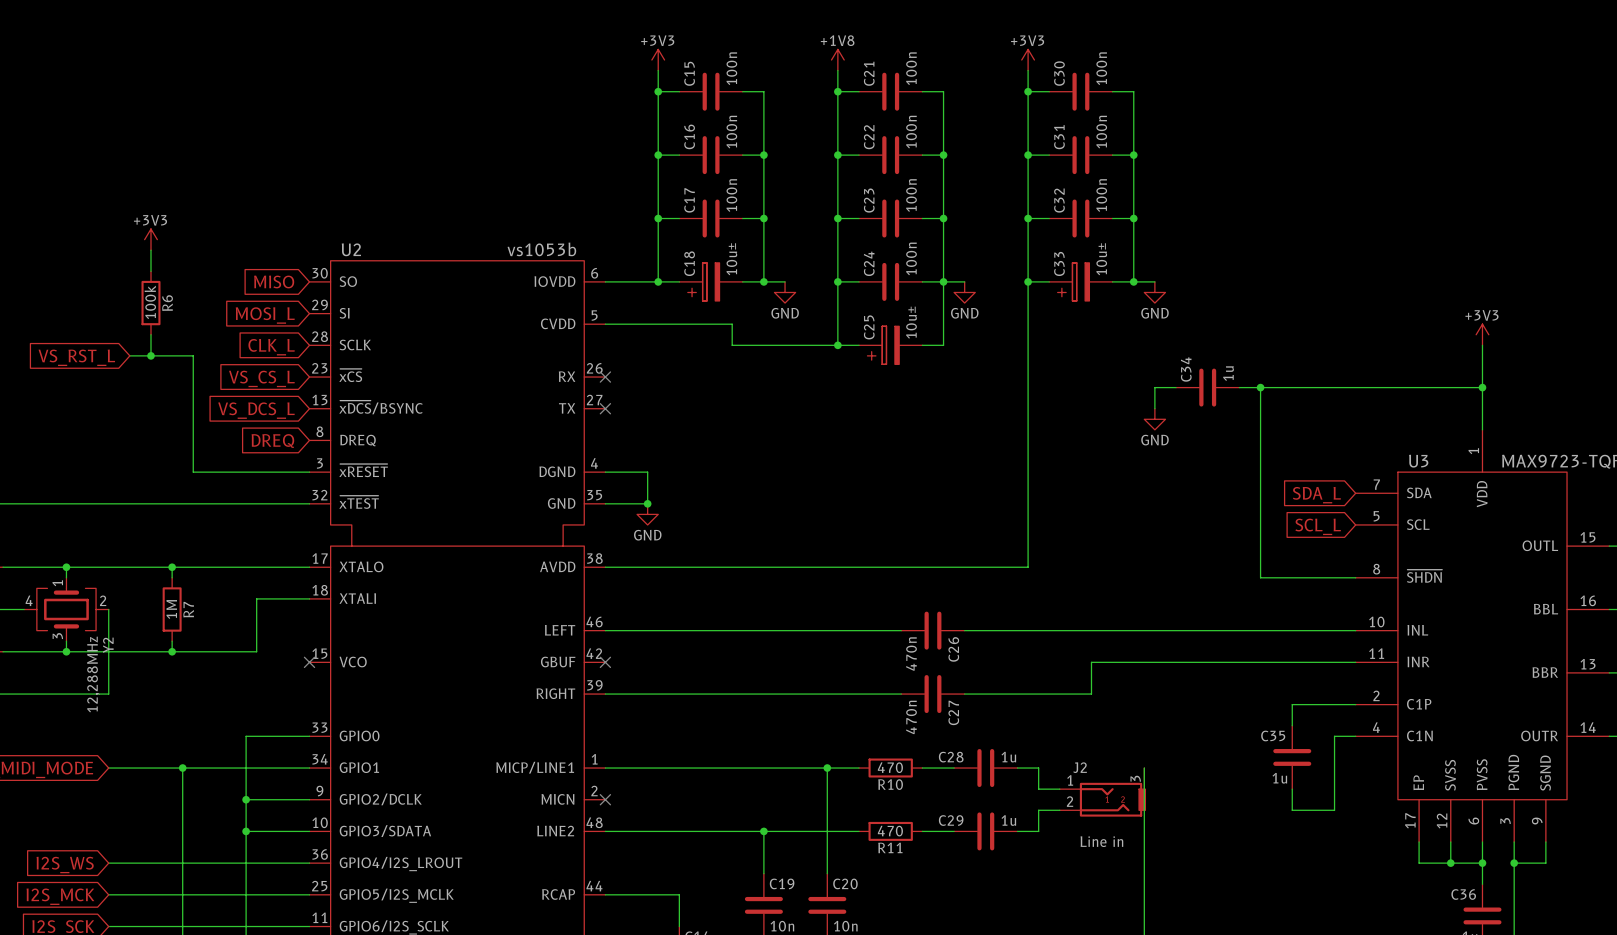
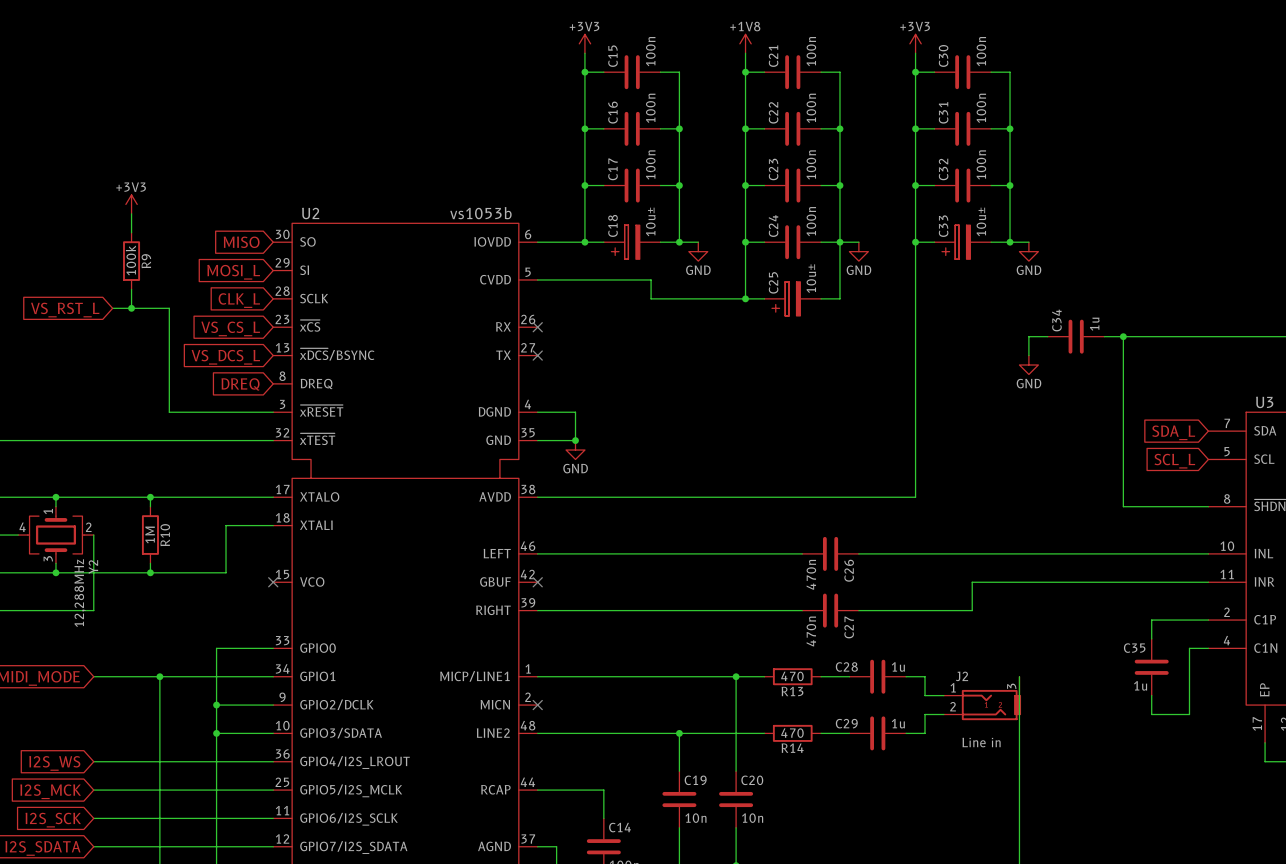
R6 name: R6 (167, 303) -> R9 (146, 261)
R7 name: R7 (188, 609) -> R10 (165, 535)
R10 name: R10 (890, 784) -> R13 (792, 691)
R11 name: R11 (890, 847) -> R14 (792, 748)

